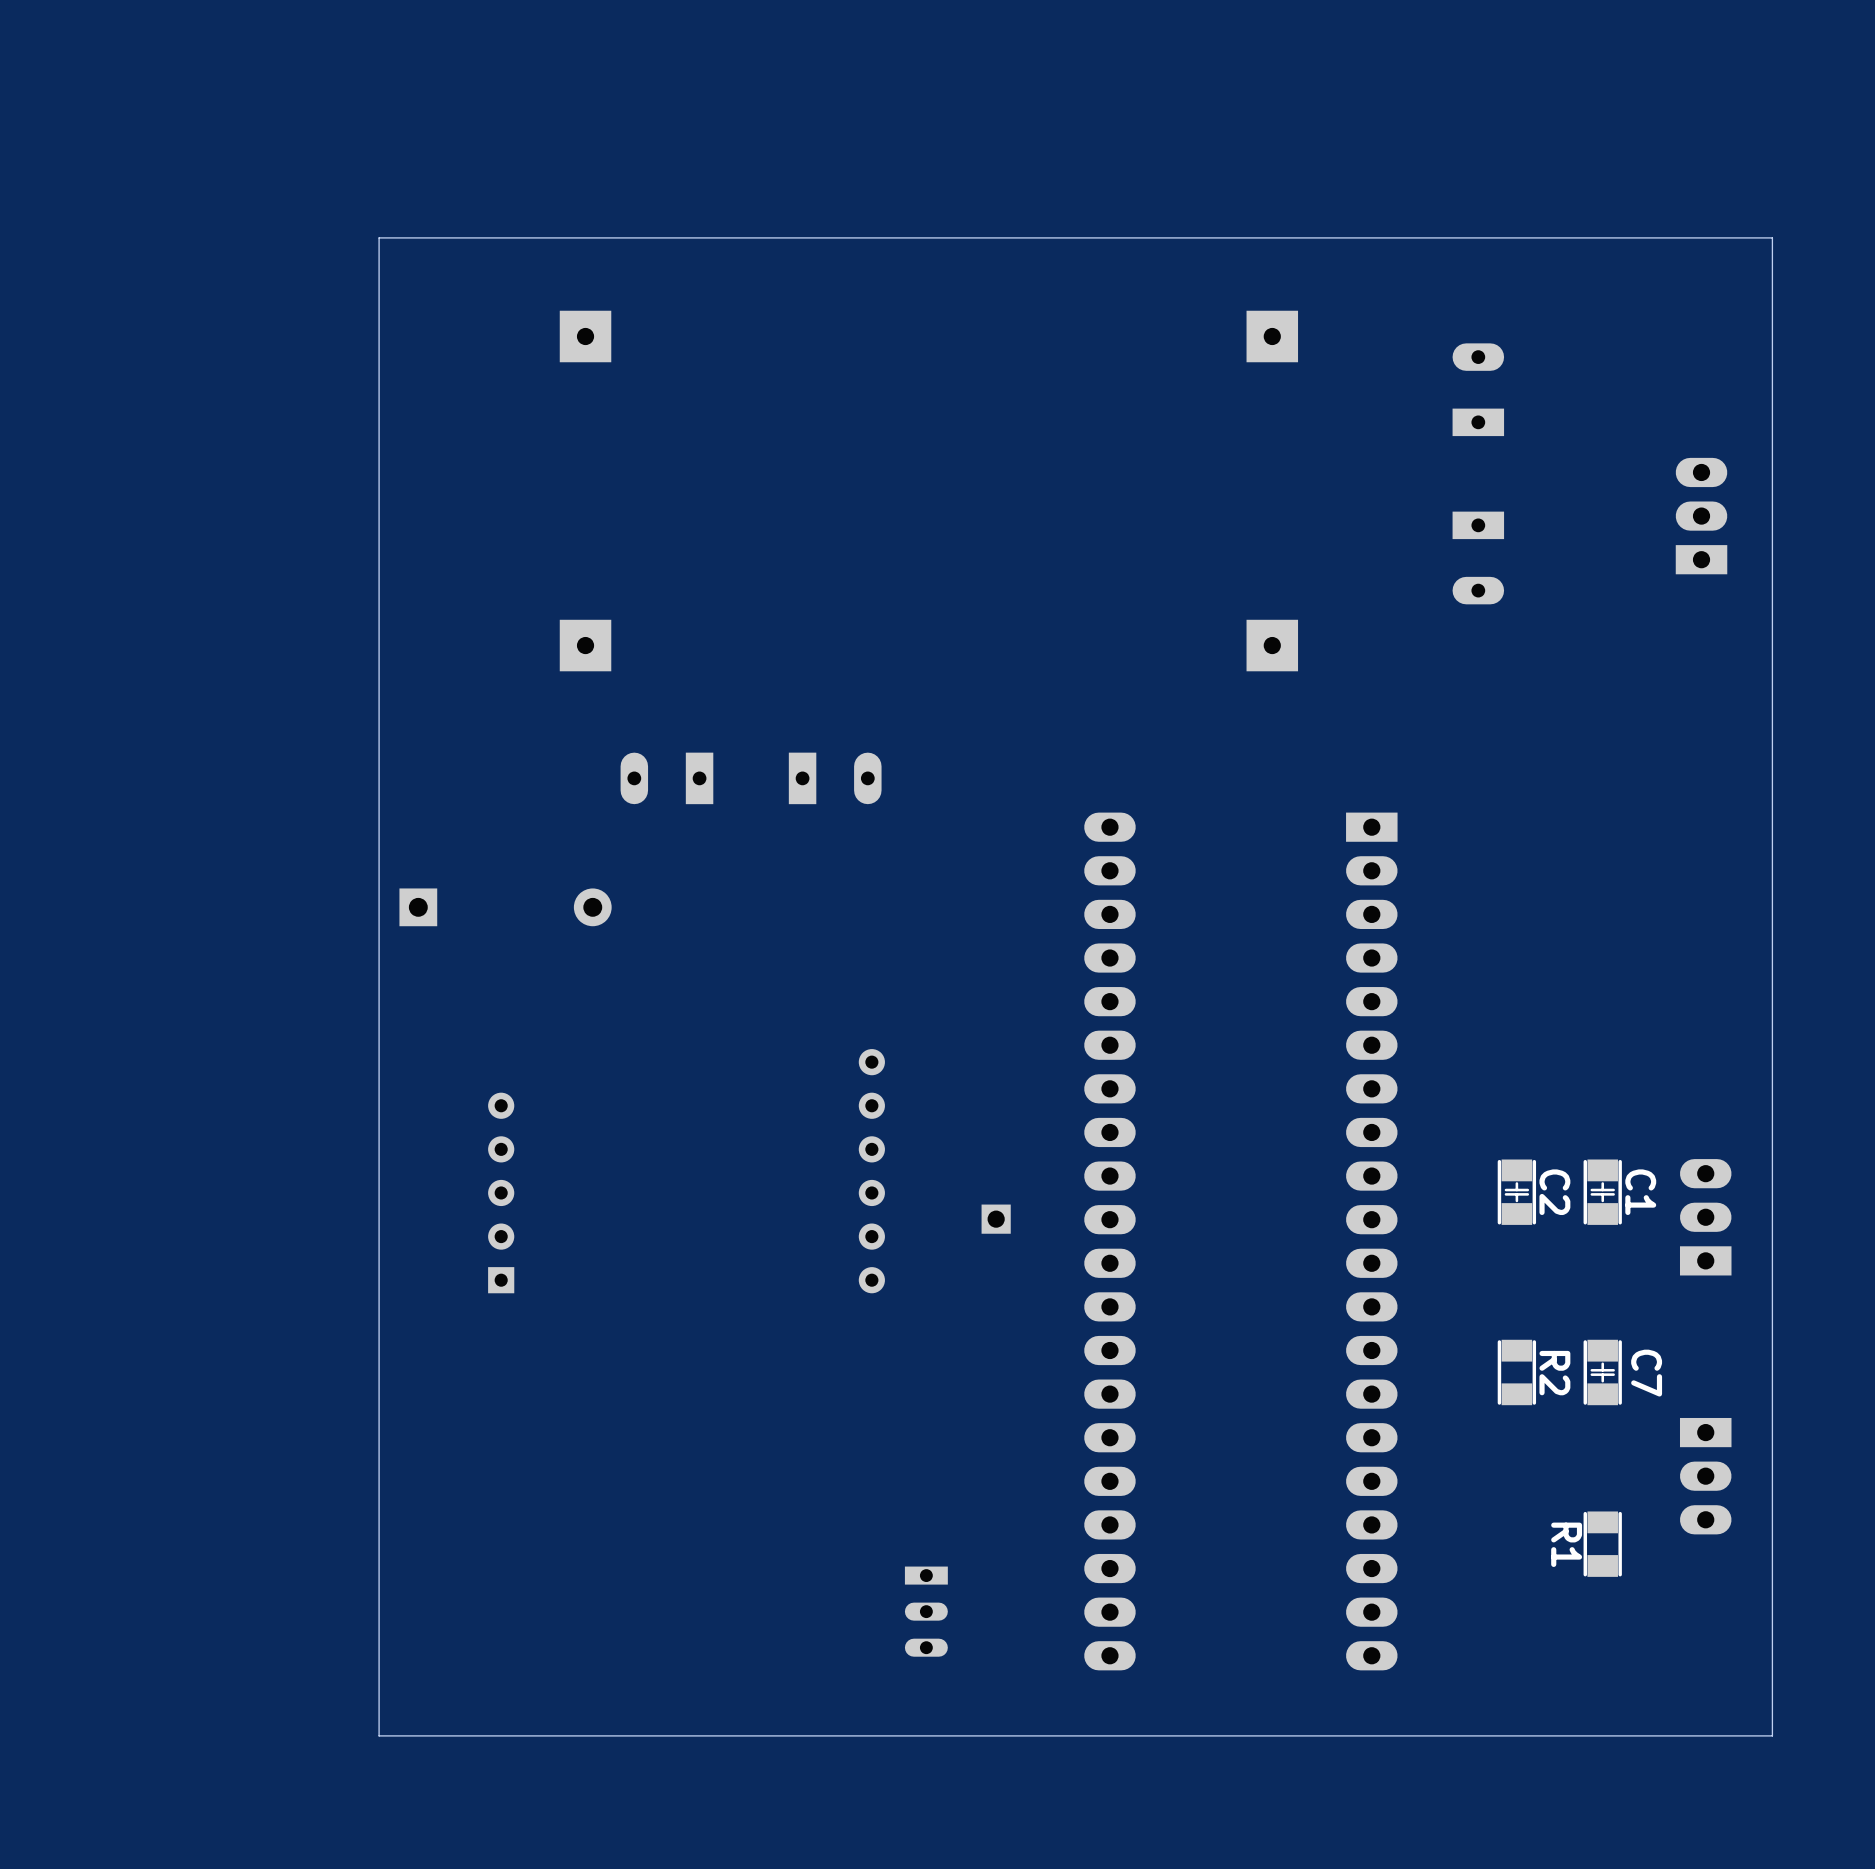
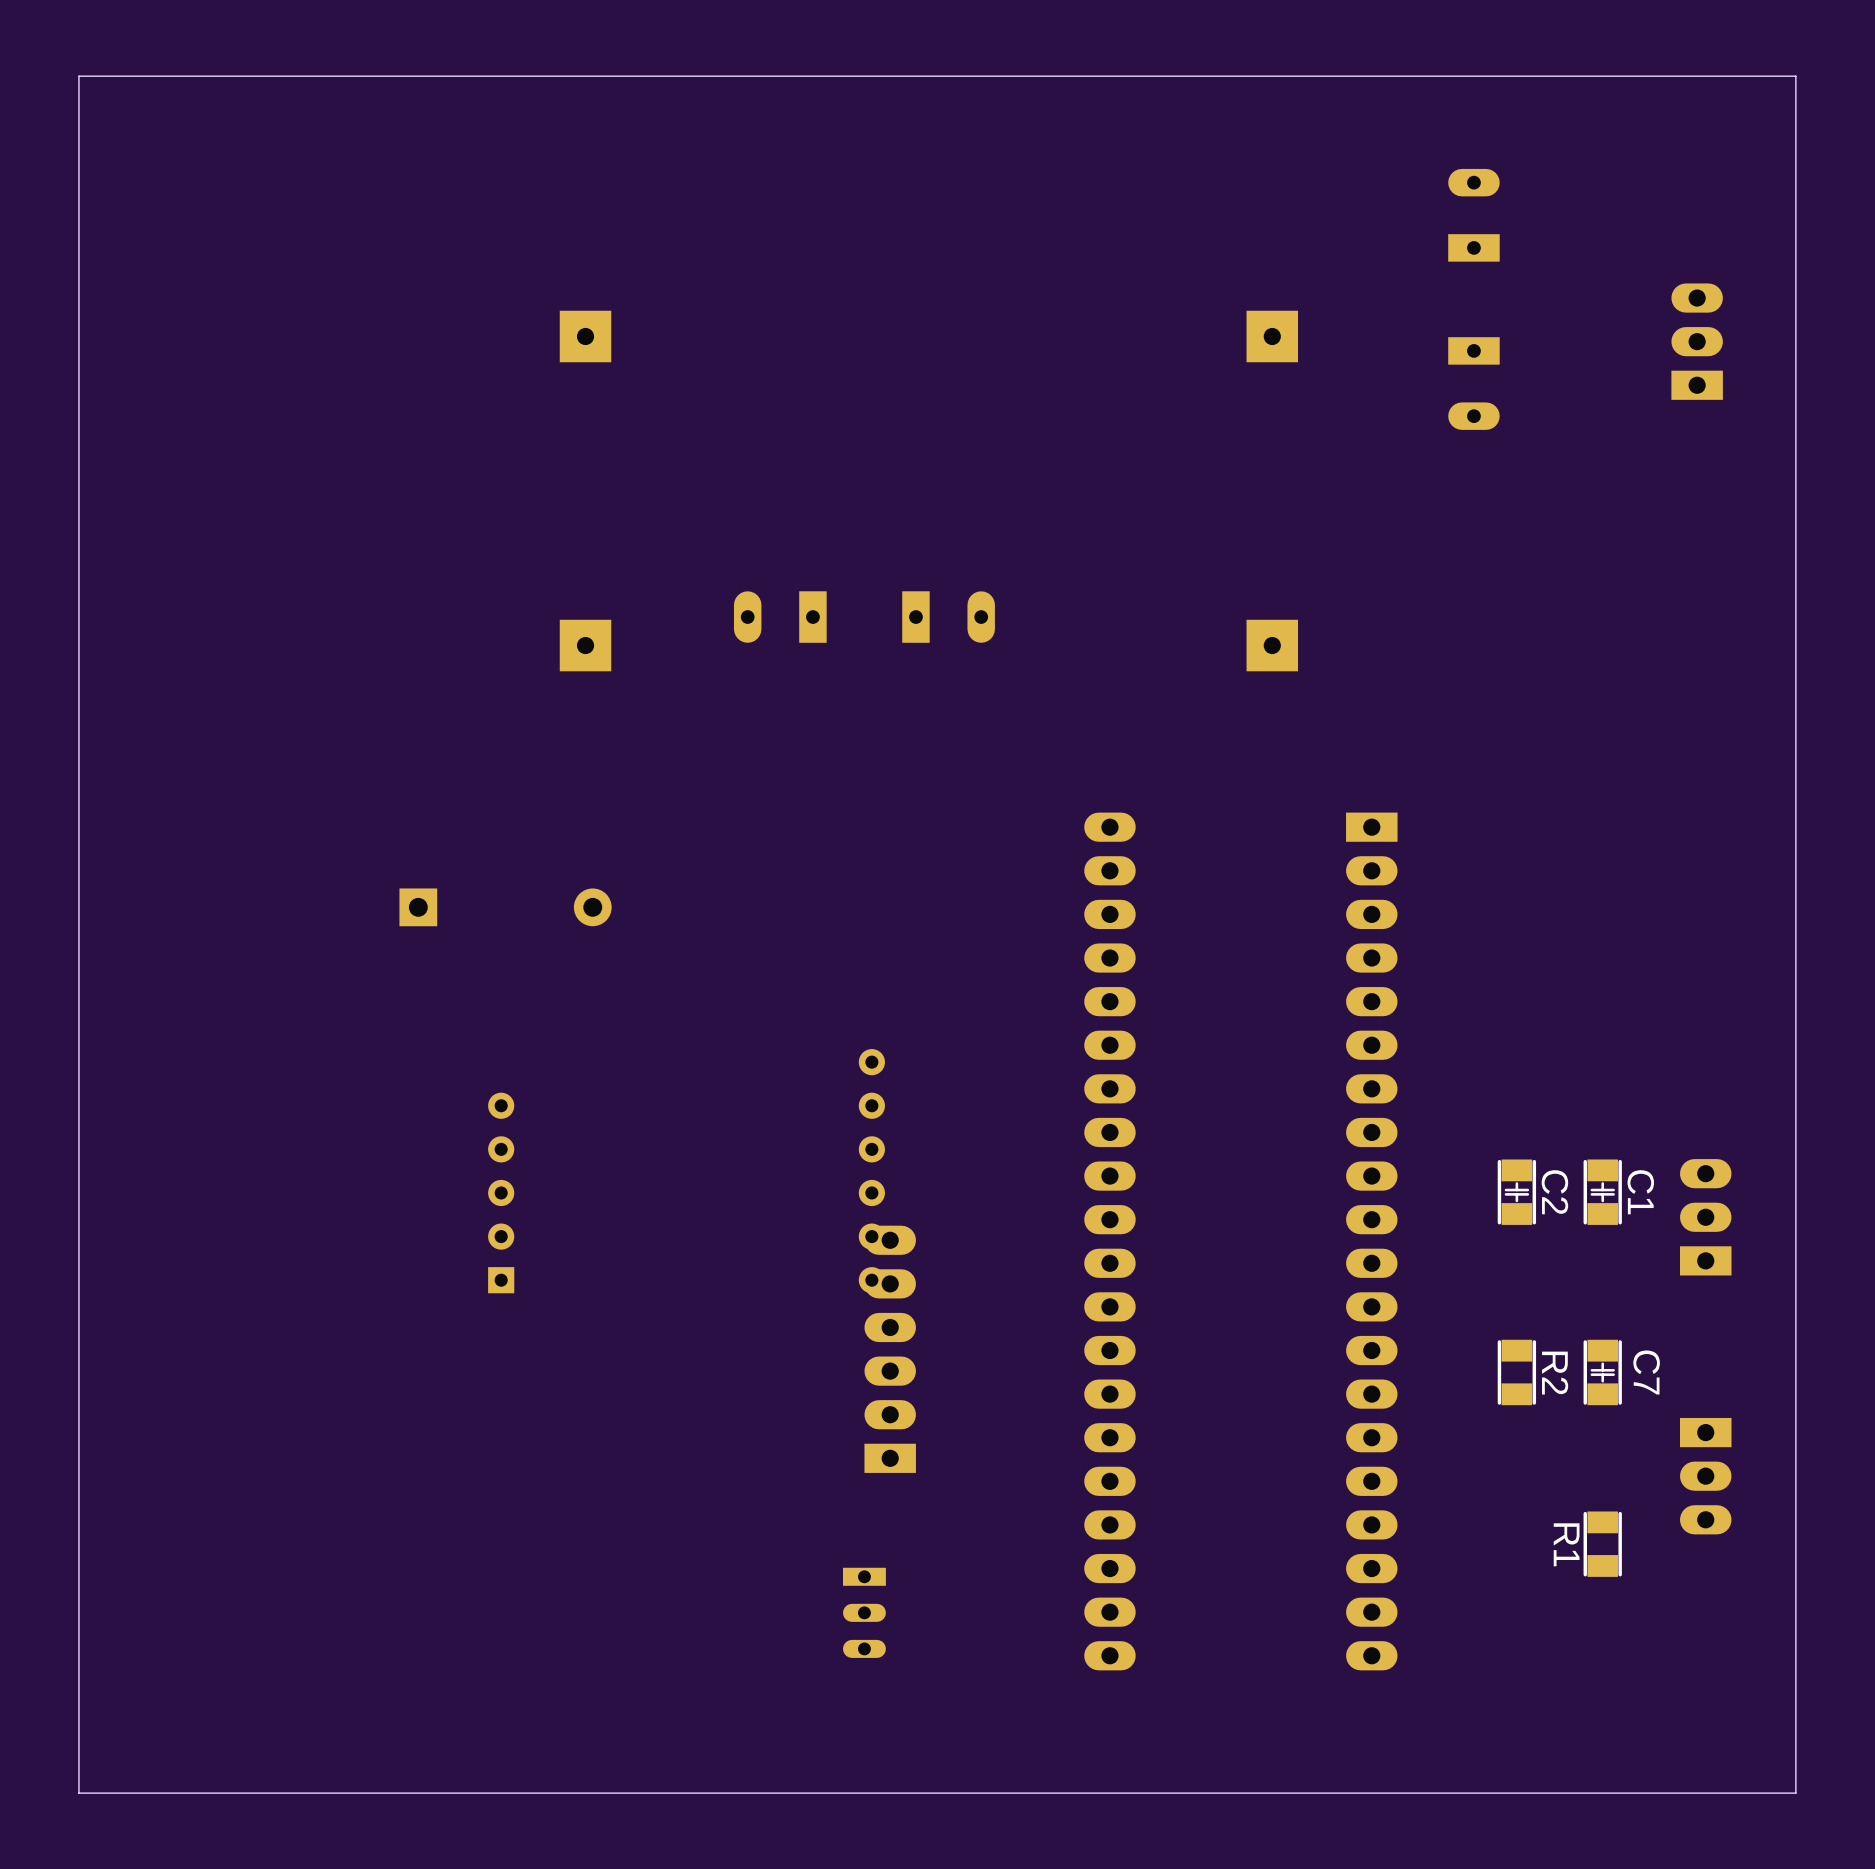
part: none -> (1473, 215)
board edge: (1772, 237) (1772, 1735) (379, 1735) (379, 237) (1772, 237) -> (1795, 76) (1795, 1793) (78, 1793) (78, 76) (1795, 76)
part rotation: 0° (1478, 389) -> 180° (1473, 383)
part position: (1701, 516) -> (1697, 341)
part: (1478, 557) -> none
part: none -> (780, 617)
part: none -> (948, 617)
part: (666, 778) -> none
part: (835, 778) -> none
part: (996, 1219) -> none
part: none -> (890, 1349)
part position: (926, 1611) -> (864, 1612)

